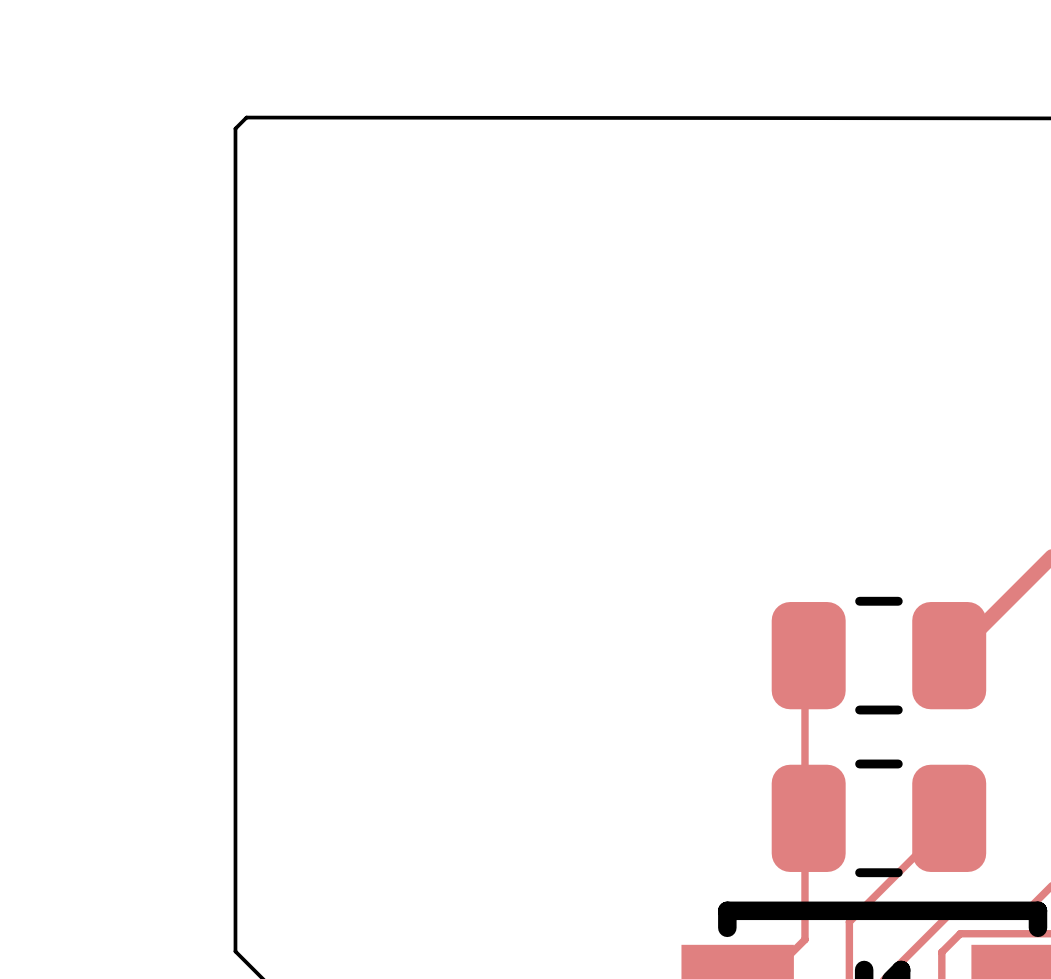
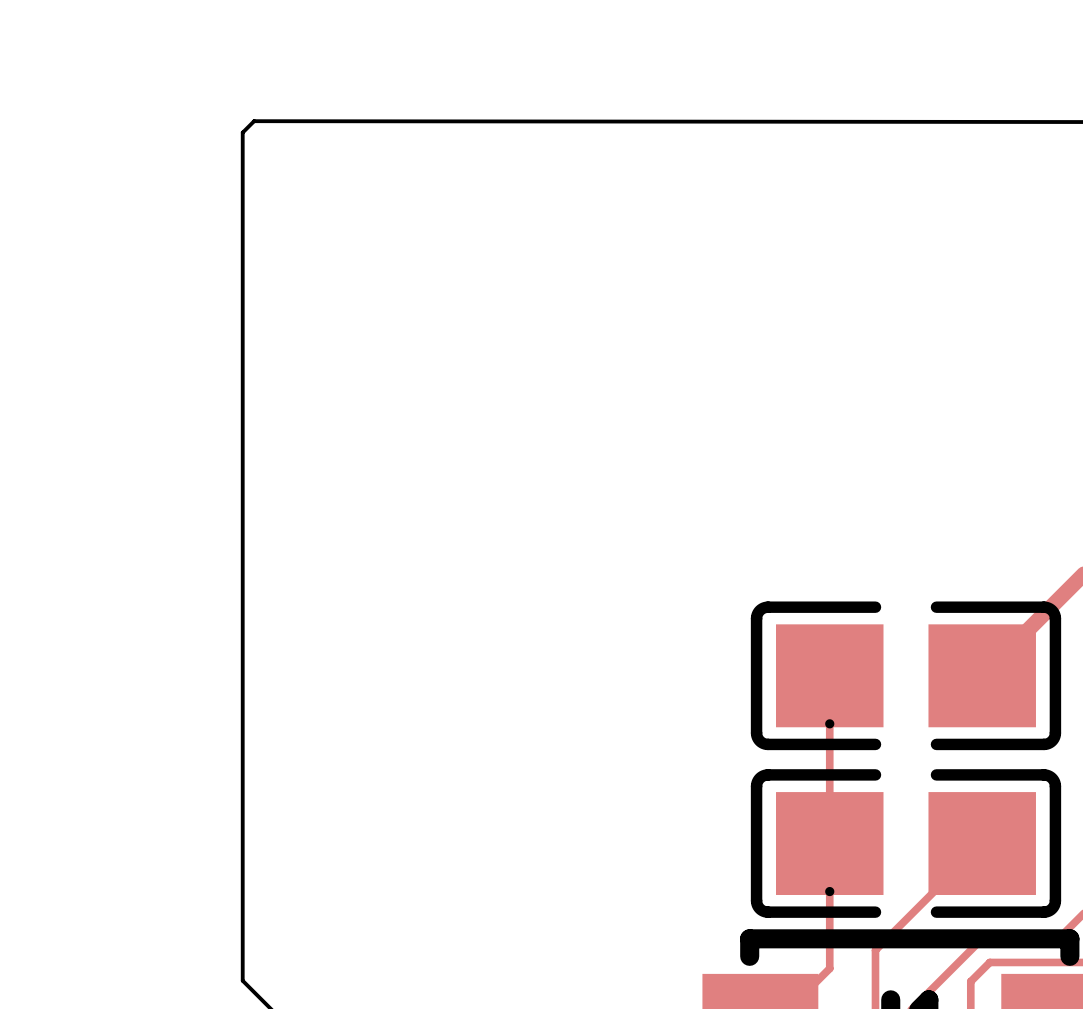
part footprint: [771, 596, 987, 715] -> [750, 601, 1062, 751]
part footprint: [771, 759, 987, 878] -> [750, 769, 1062, 918]

